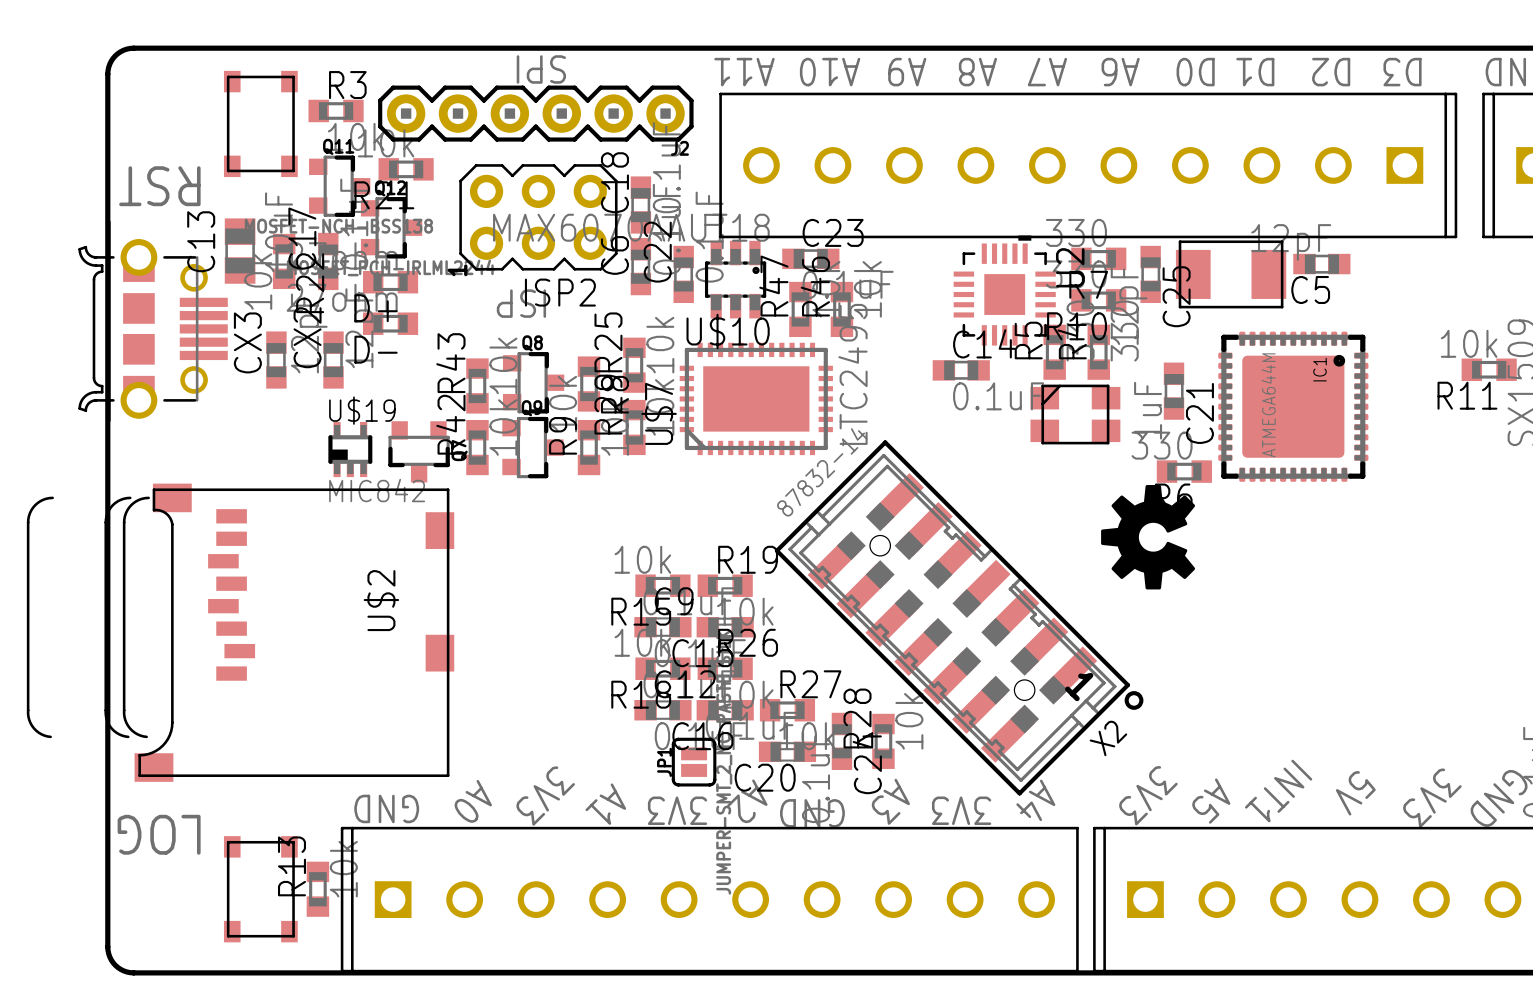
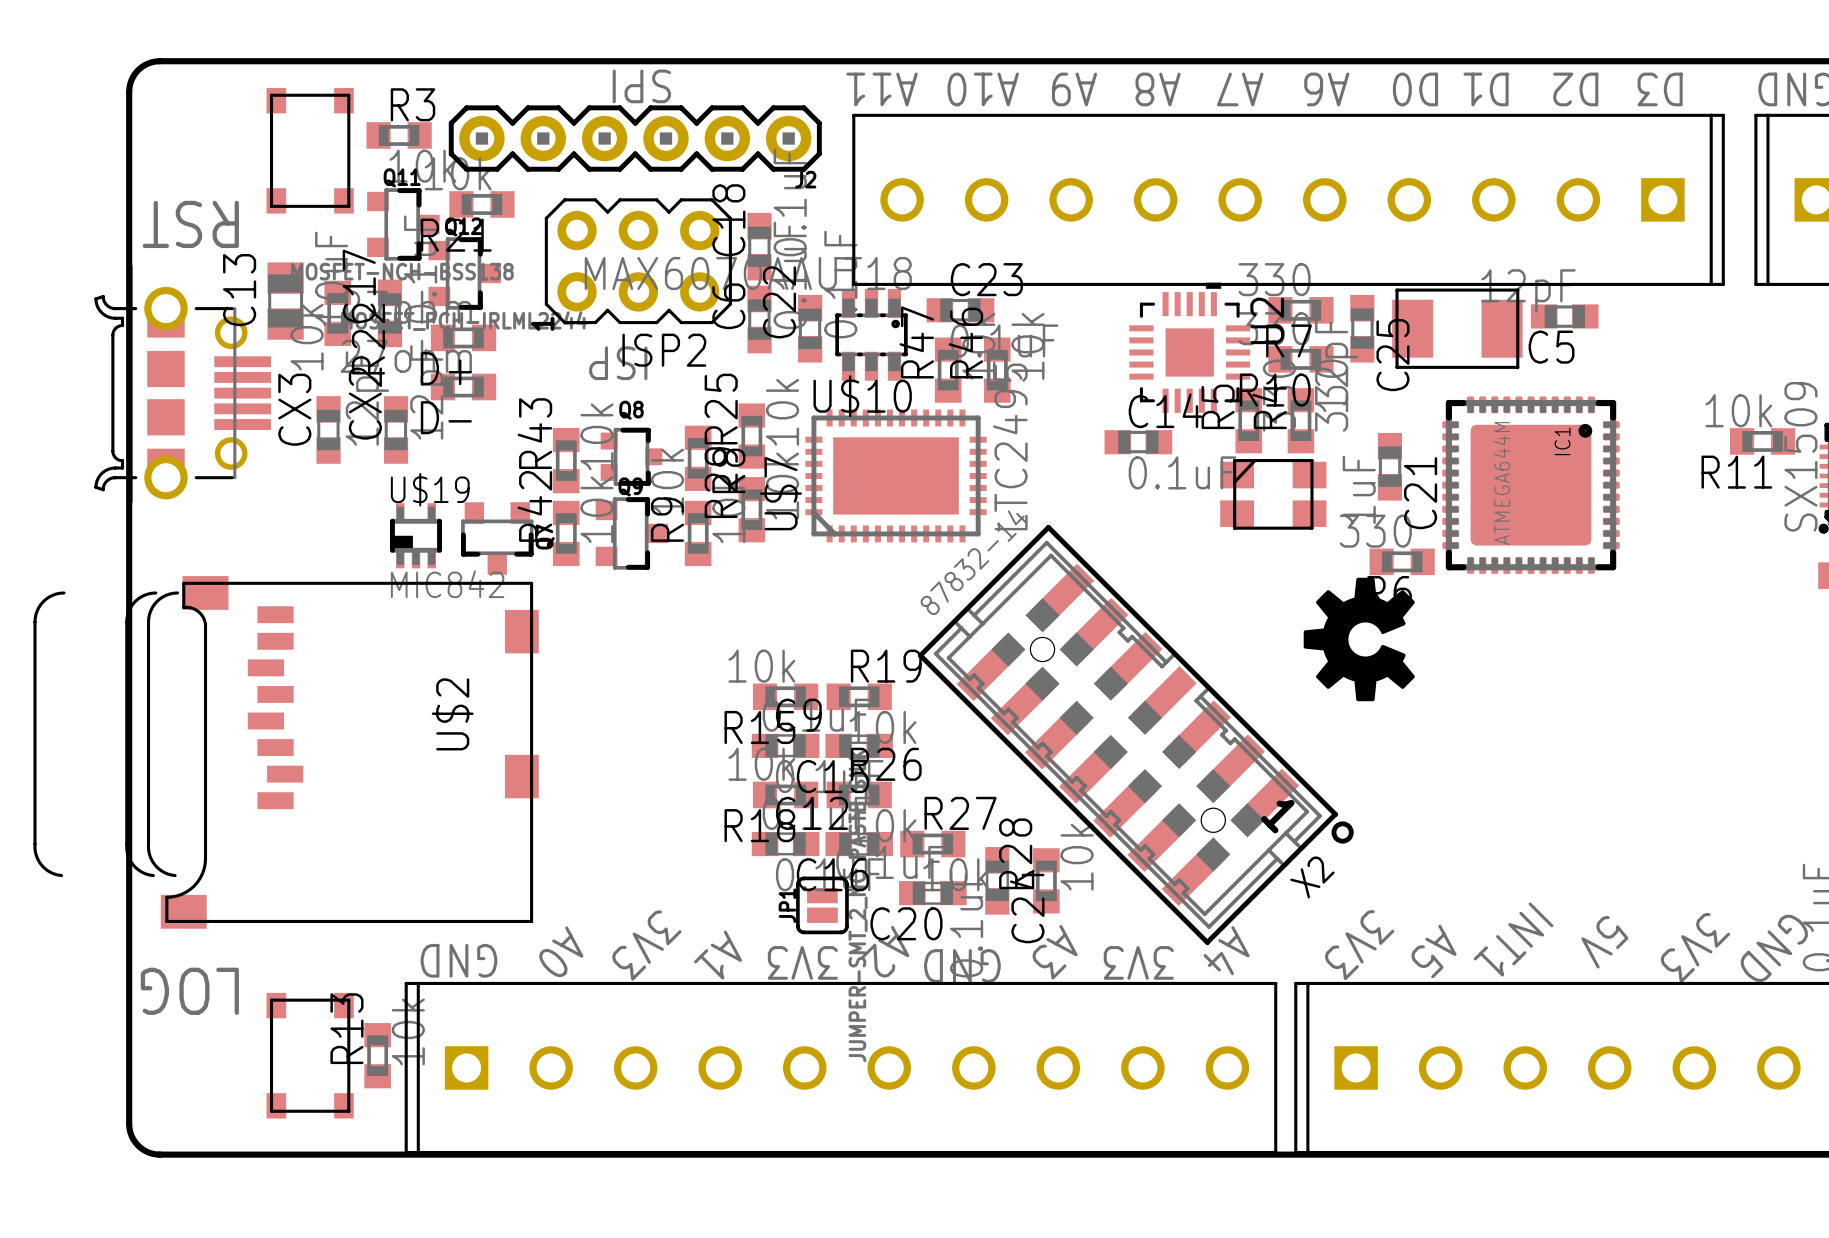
Q8 footprint: [502, 352, 565, 414] -> [600, 427, 663, 486]

